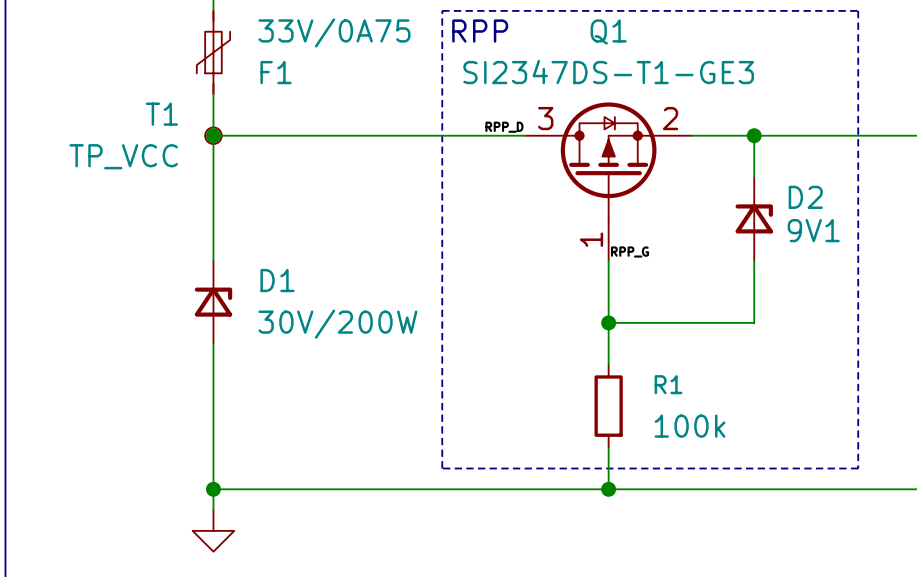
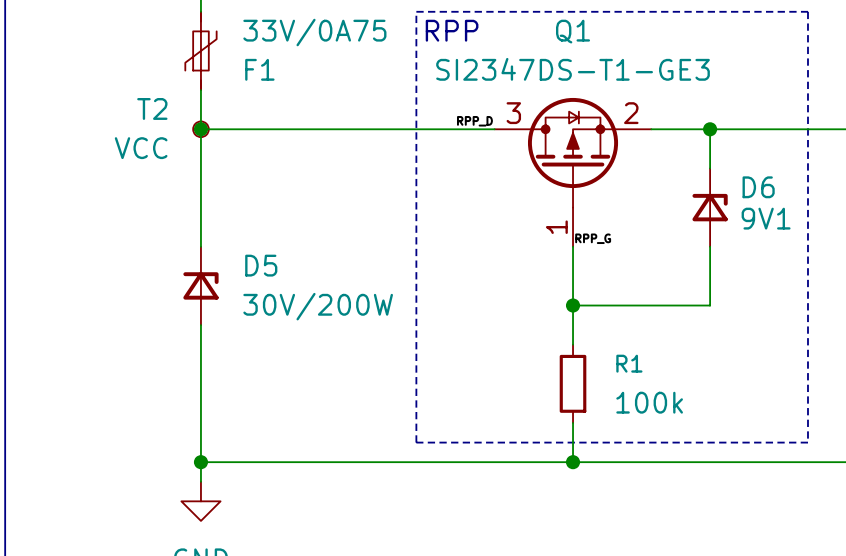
T1 name: T1 (161, 114) -> T2 (152, 108)
T1 value: TP_VCC (123, 156) -> VCC (141, 148)
D2 name: D2 (805, 197) -> D6 (758, 187)
D1 name: D1 (277, 280) -> D5 (261, 265)

